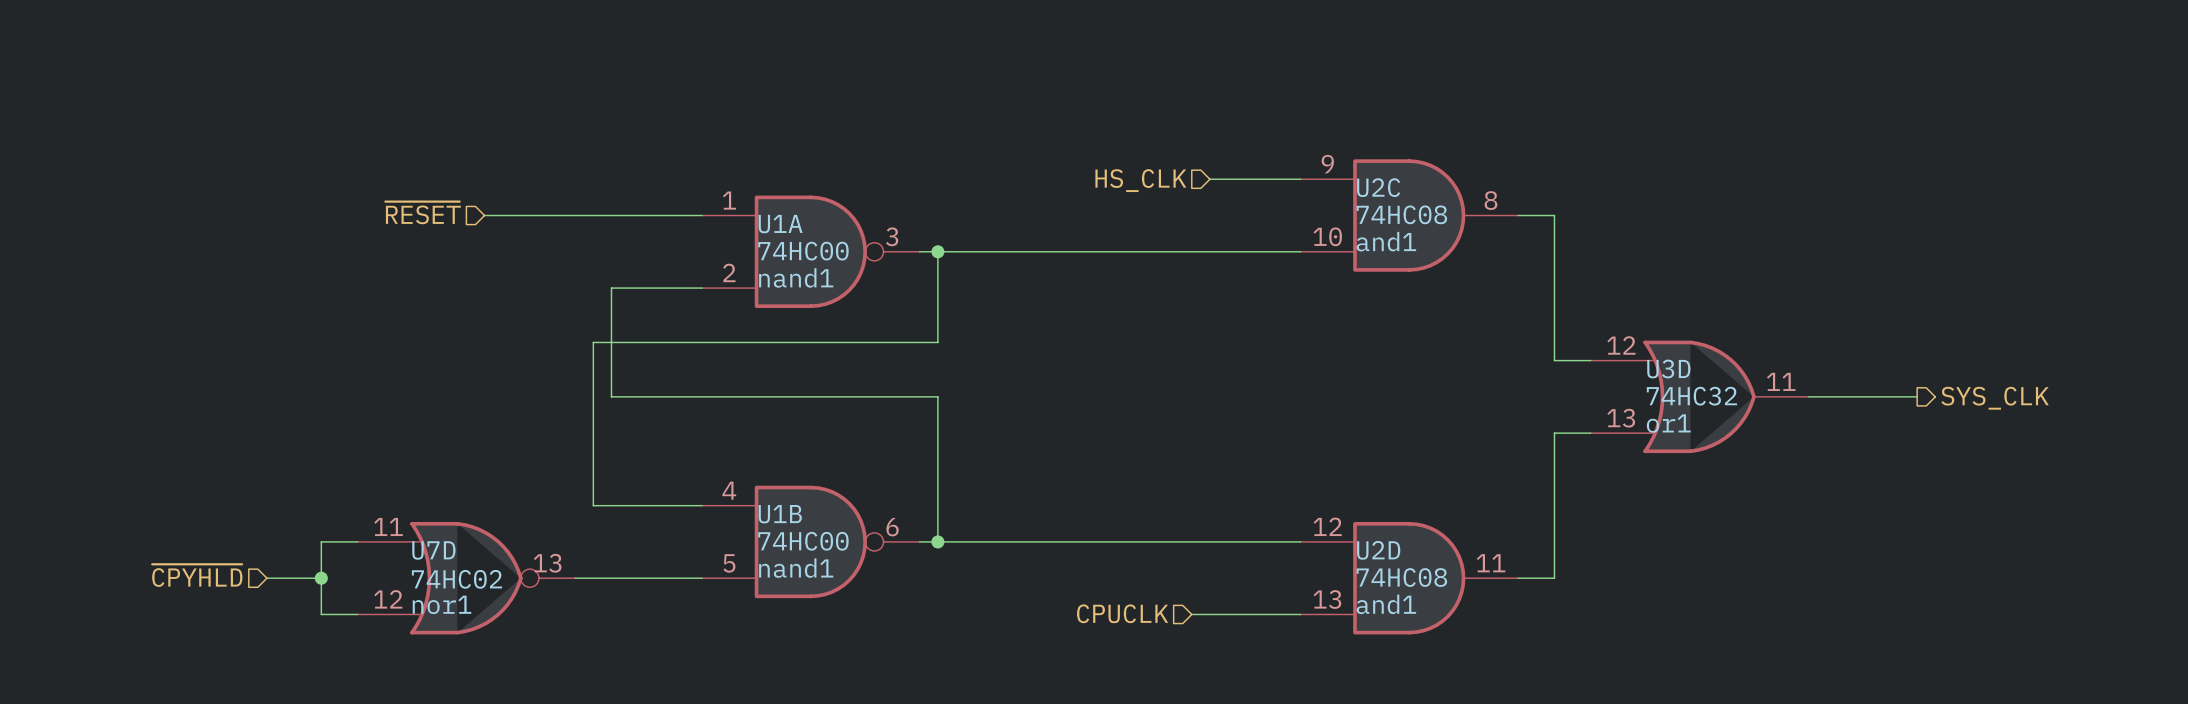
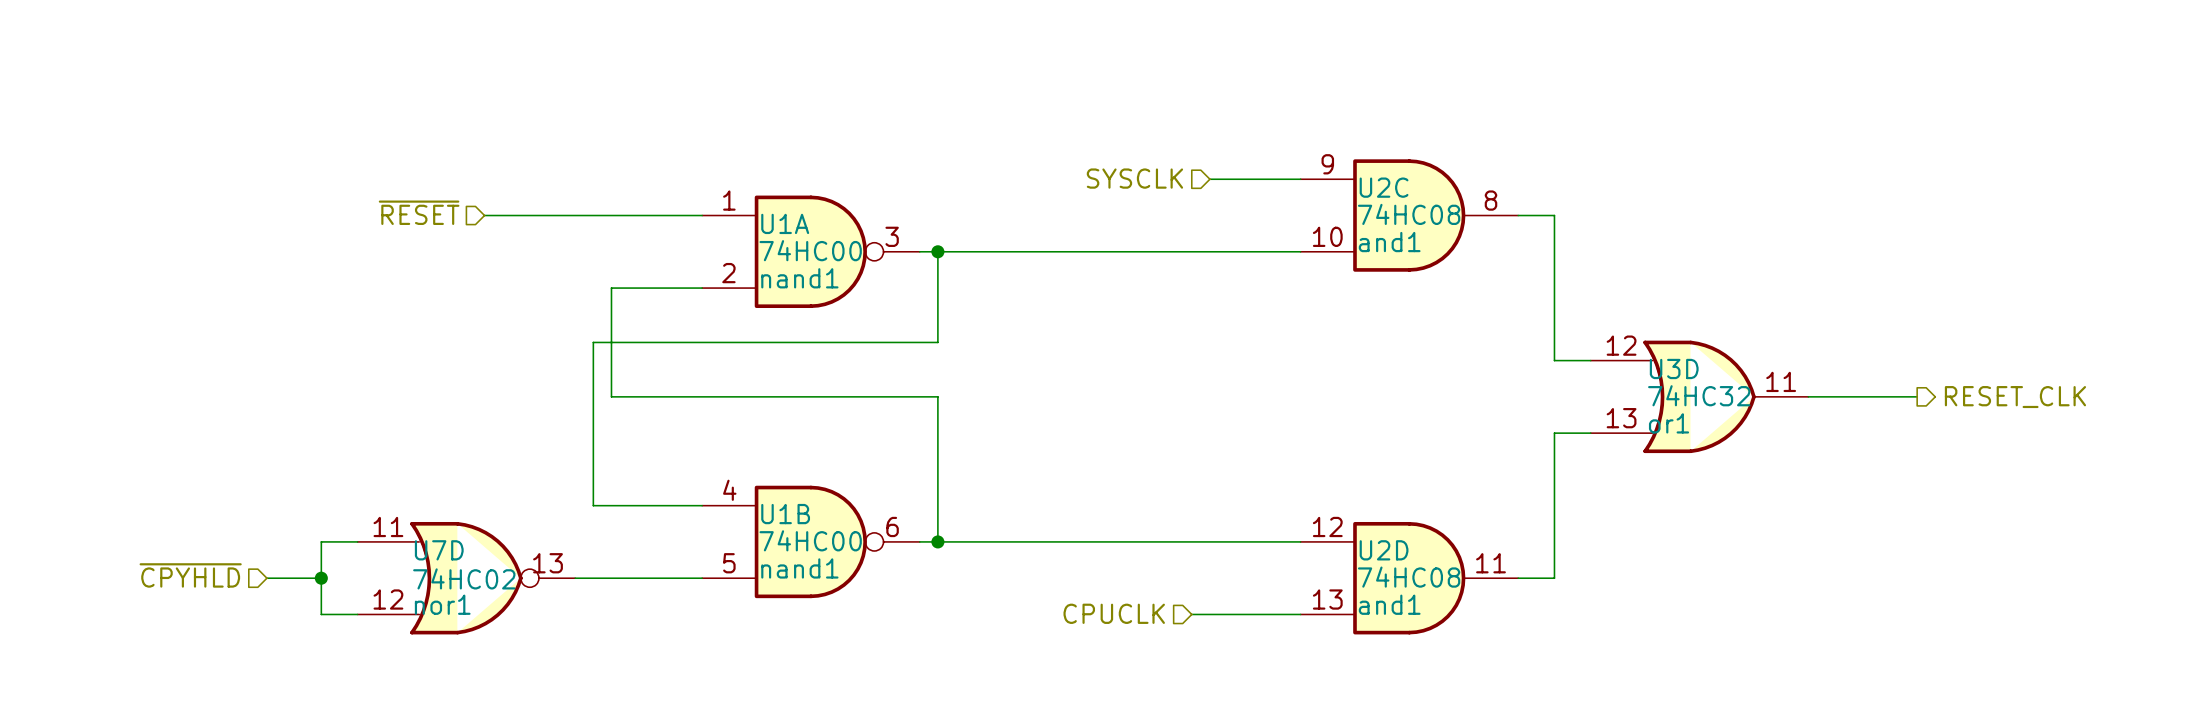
hierarchical label: HS_CLK (1140, 180) -> SYSCLK (1134, 178)
hierarchical label: SYS_CLK (1995, 398) -> RESET_CLK (2015, 397)

